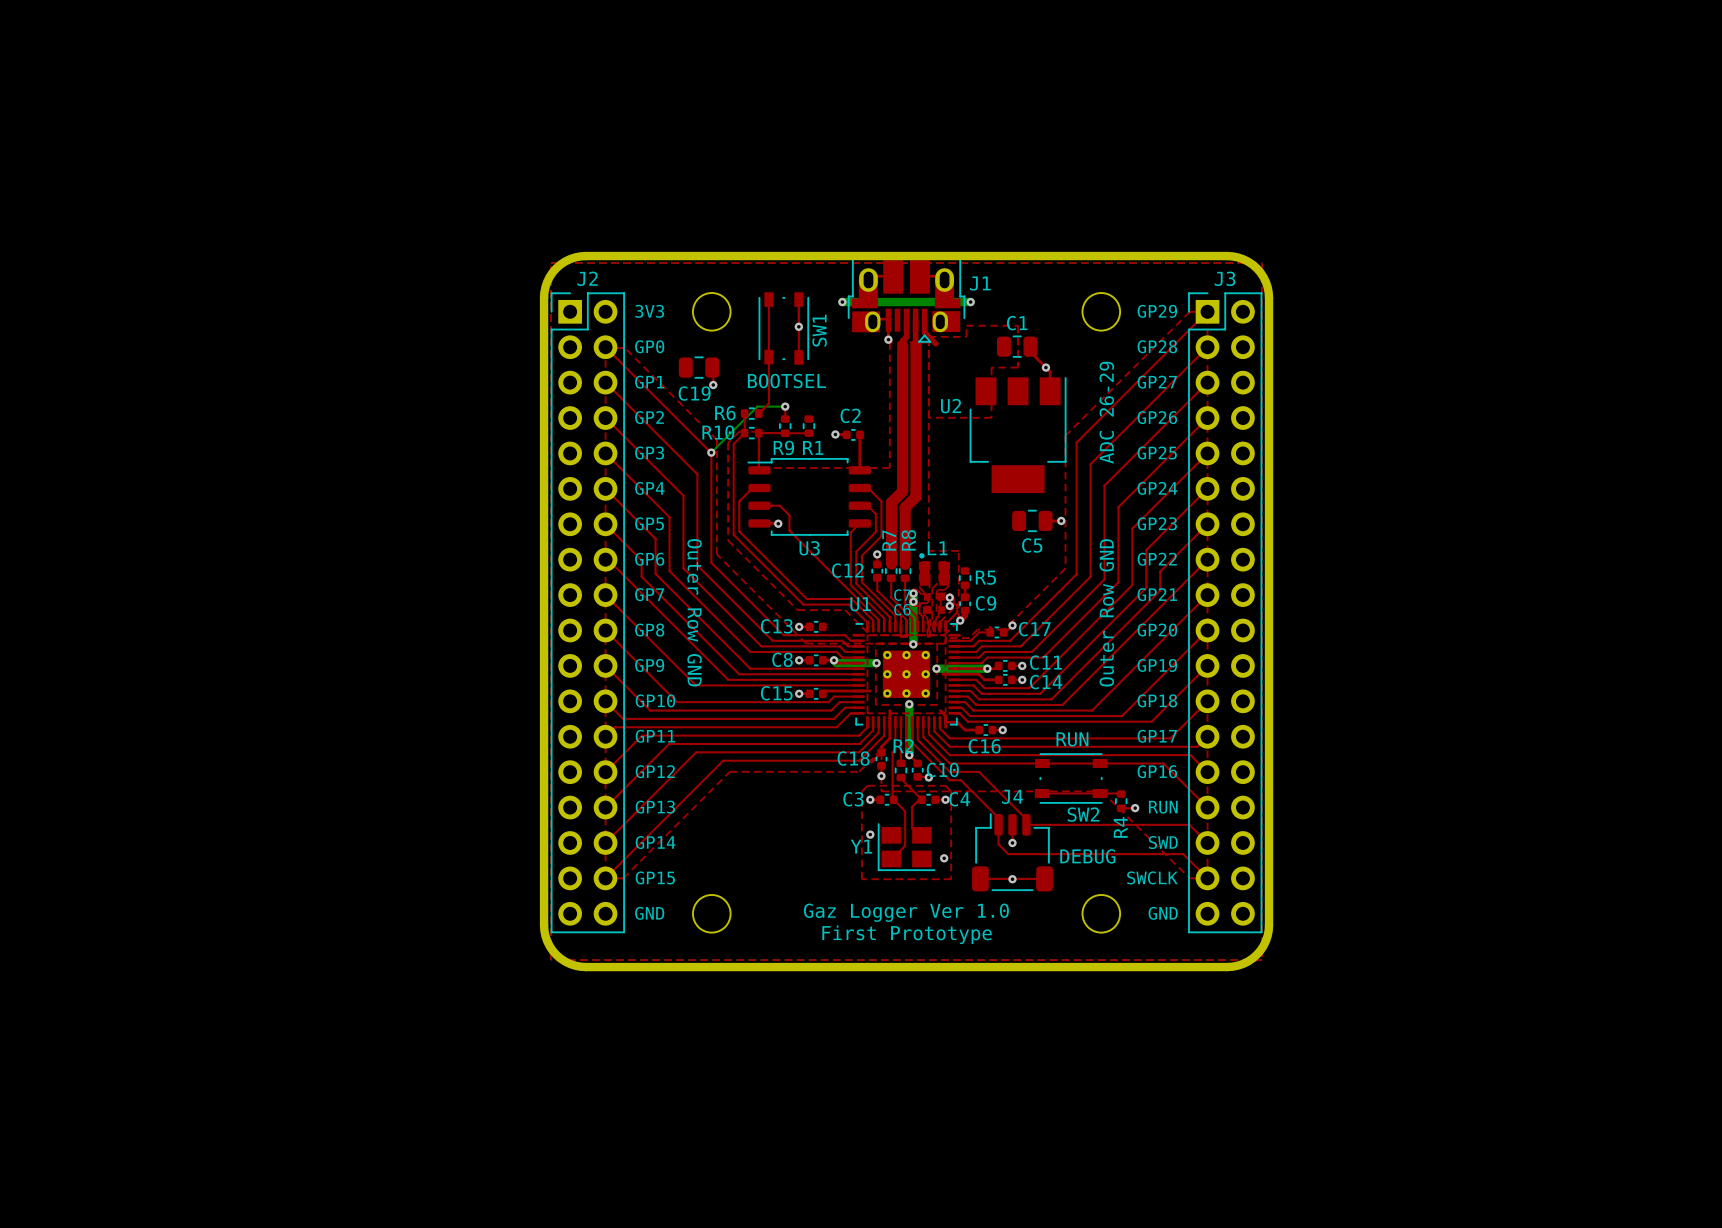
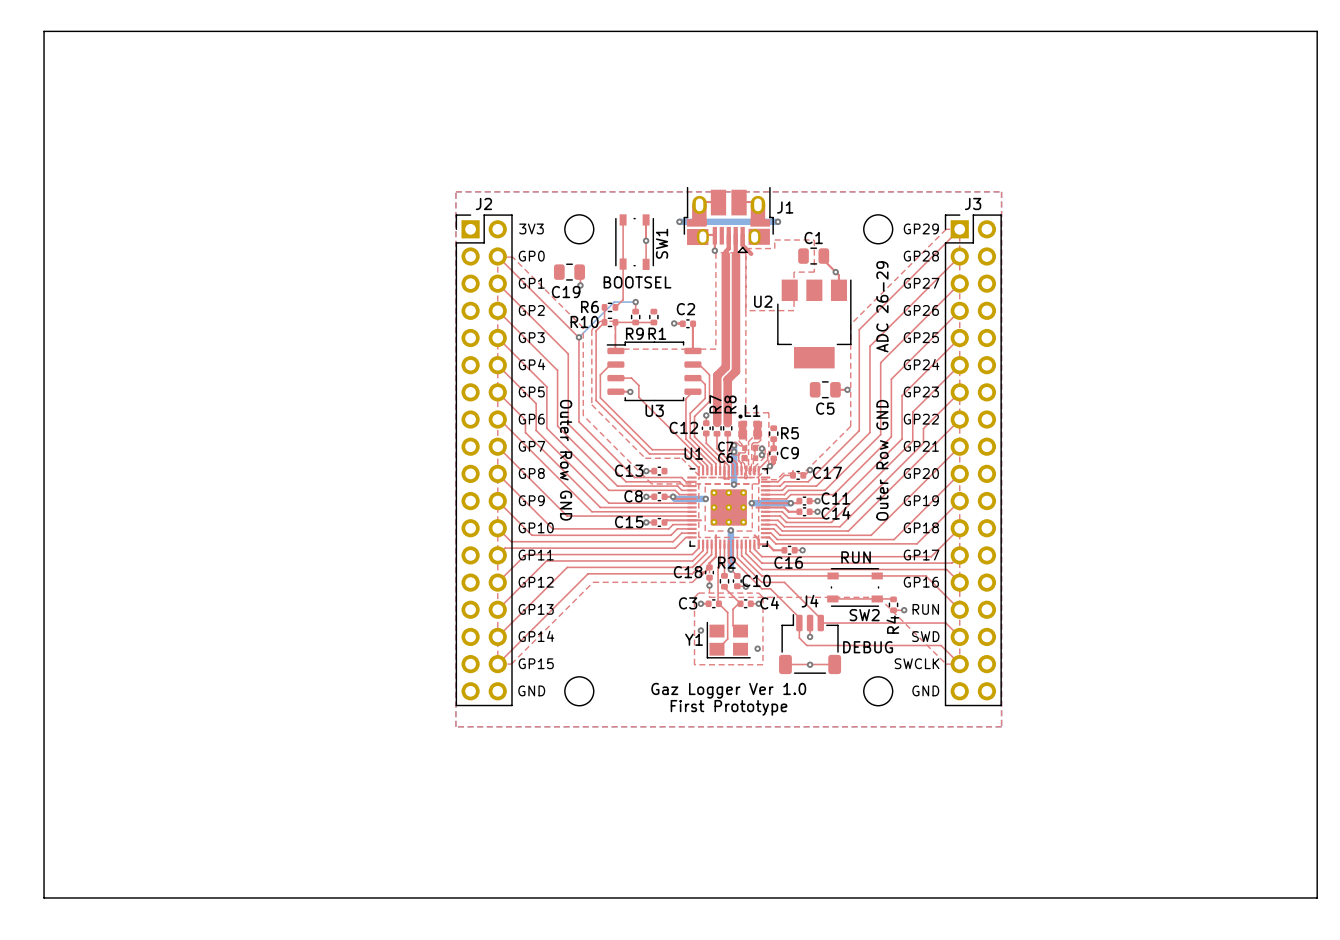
board edge: none -> (44, 31) (1317, 31) (1317, 897) (44, 897) (44, 31)
board edge: (585, 256) (1227, 256) (1243, 259) (1256, 268) (1265, 281) (1269, 297) (1269, 925) (1265, 941) (1256, 954) (1243, 963) (1227, 967) (585, 967) (569, 963) (556, 954) (547, 941) (544, 925) (544, 297) (547, 281) (556, 268) (569, 259) (585, 256) -> none

